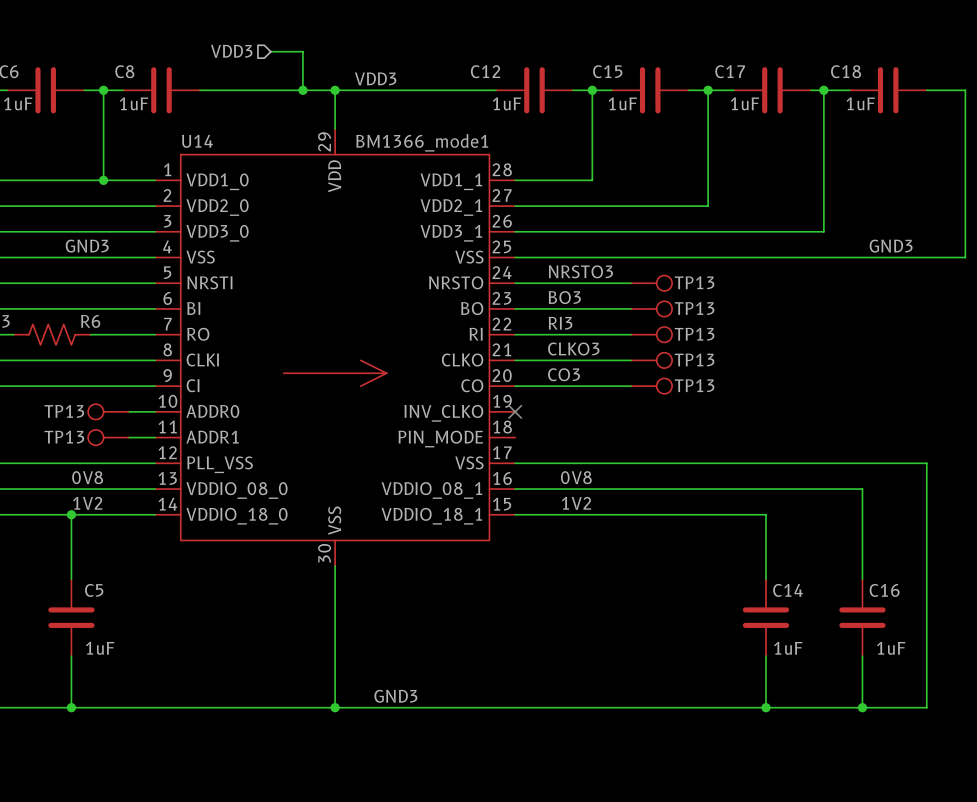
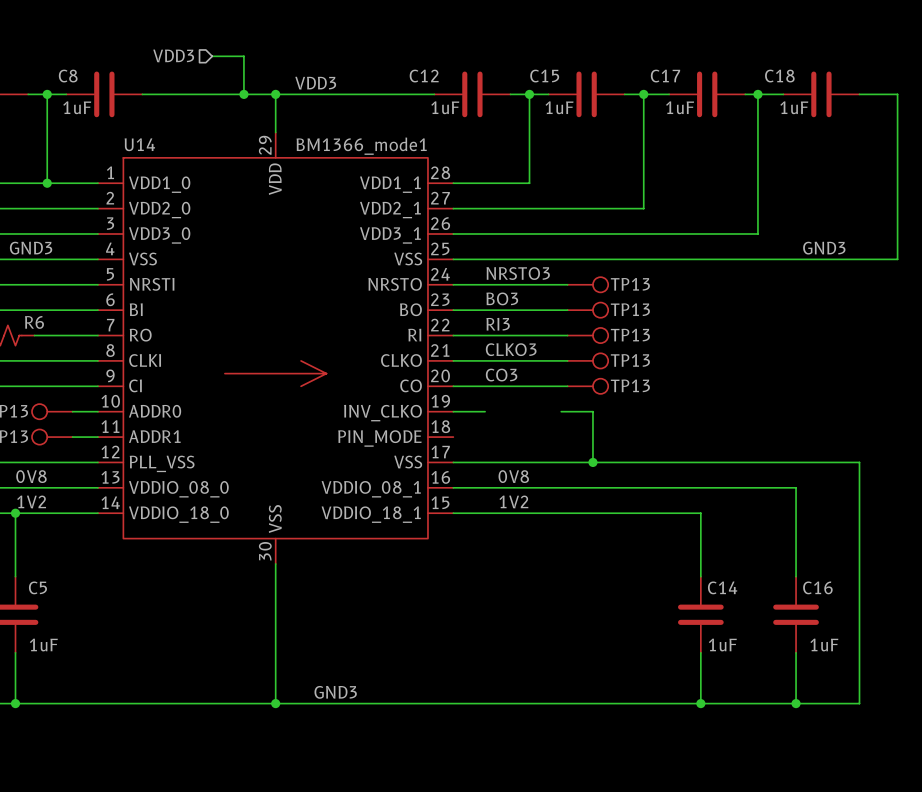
wire: none -> (453, 411) (485, 411)
no-connect mark: (515, 411) -> none
wire: none -> (561, 411) (592, 411) (592, 462)
junction: none -> (592, 462)

